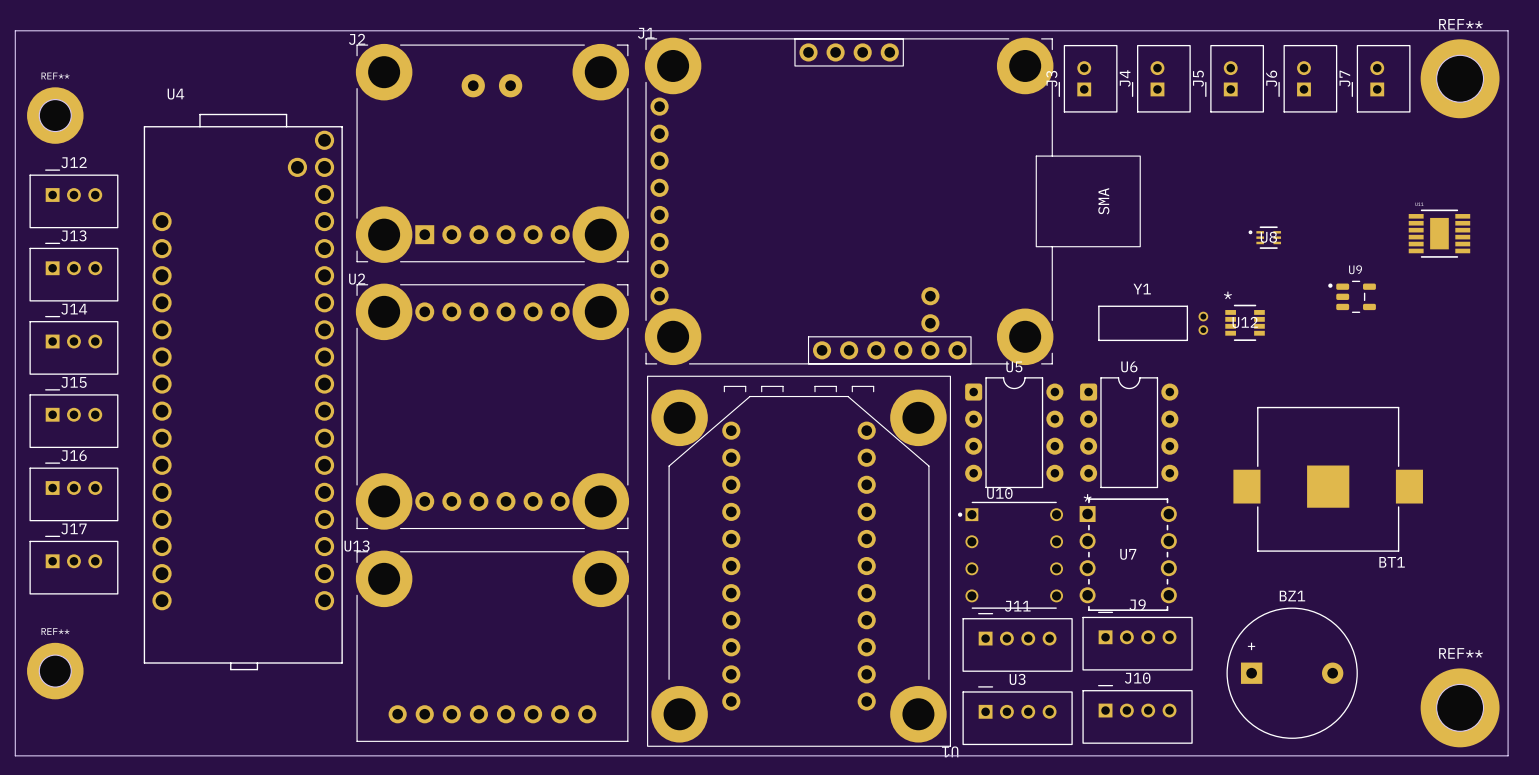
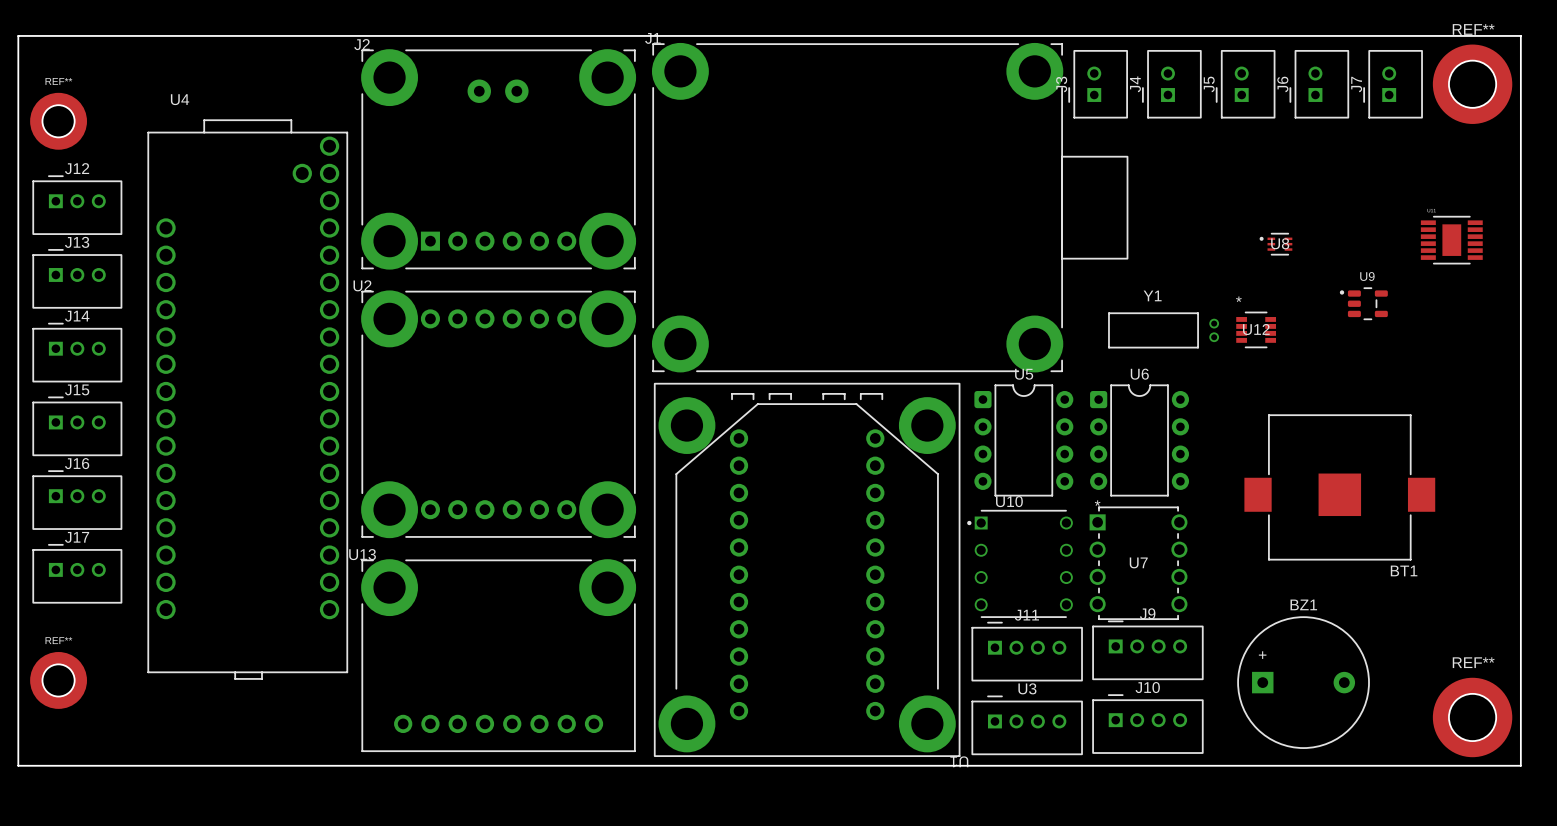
J1 footprint: [644, 37, 1141, 366] -> [651, 42, 1129, 373]

